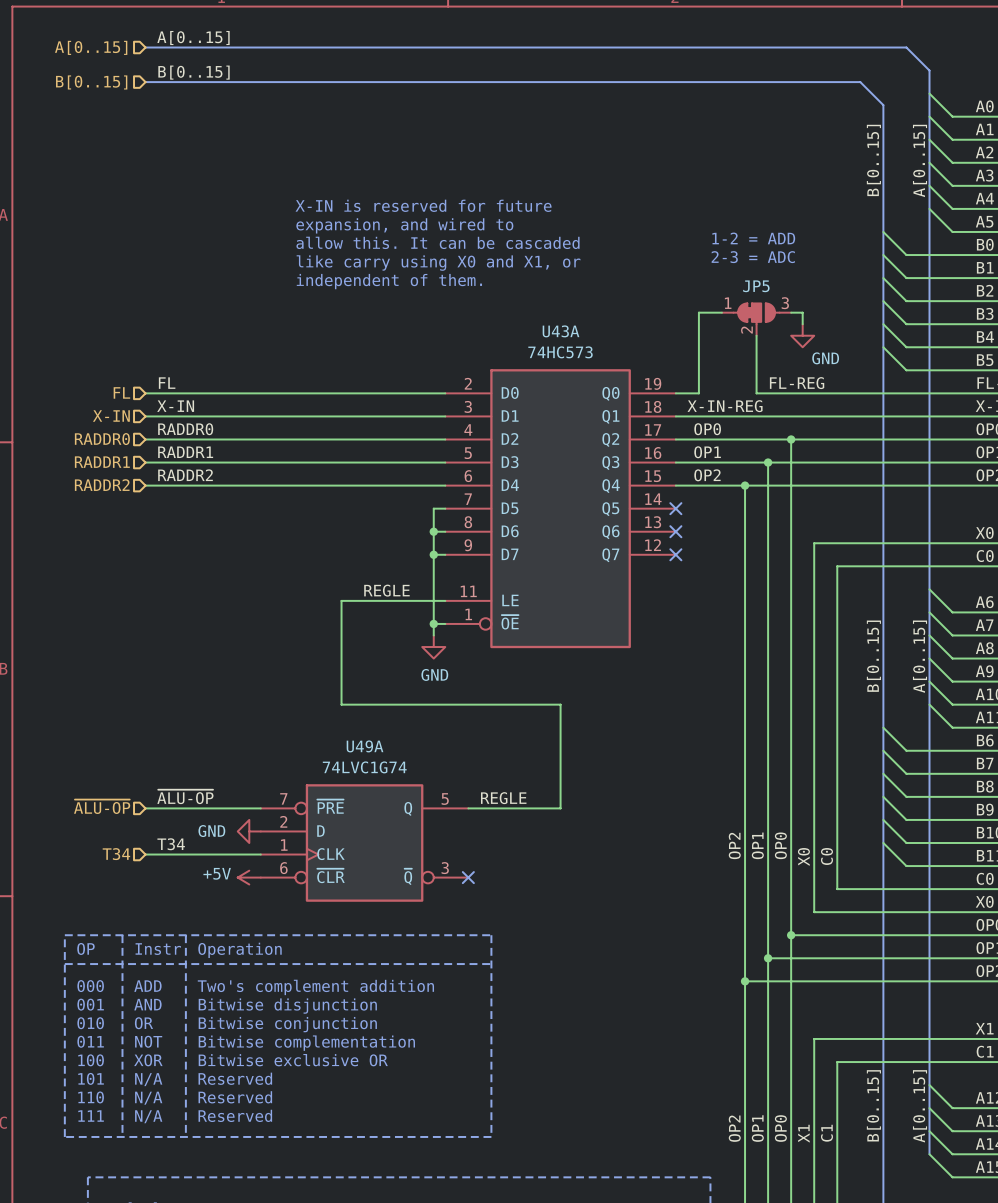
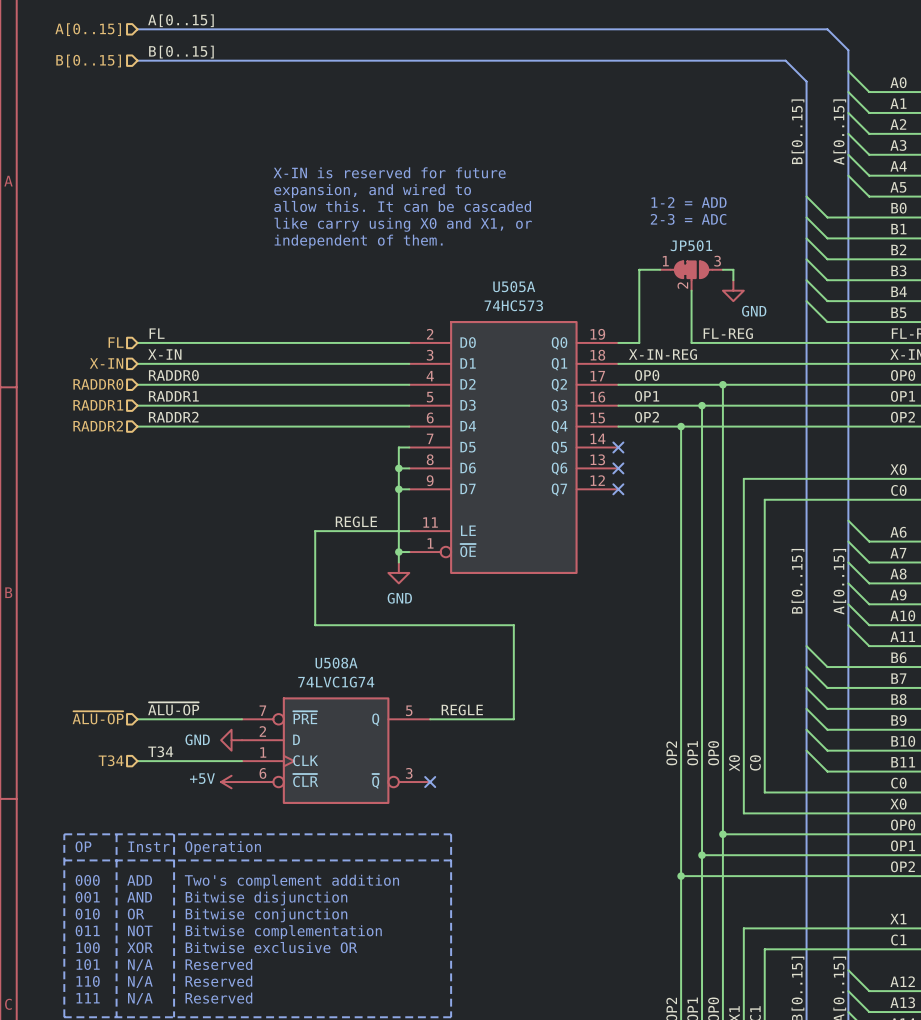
JP5 name: JP5 (756, 286) -> JP501 (691, 245)
U43A name: U43A (561, 331) -> U505A (514, 286)
U49A name: U49A (365, 746) -> U508A (336, 663)

